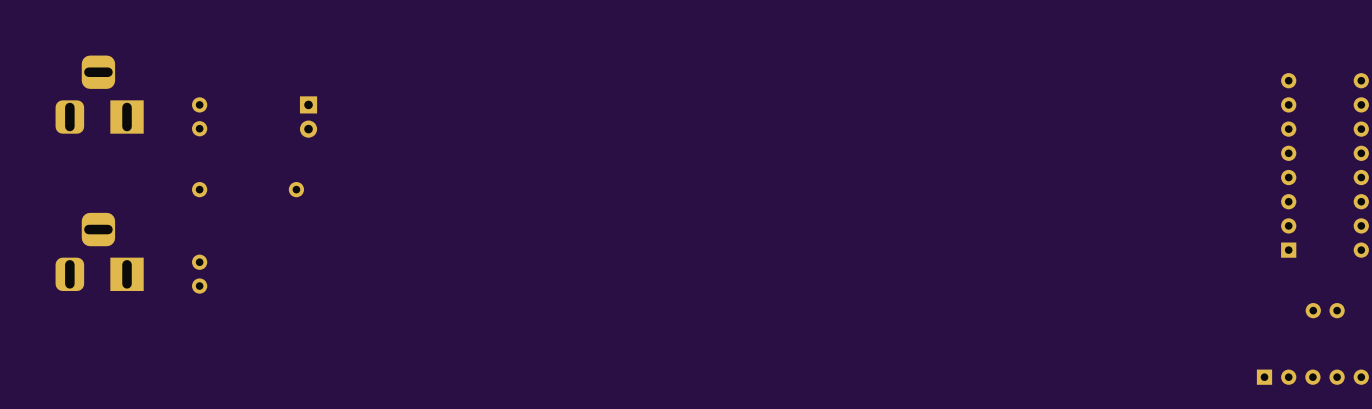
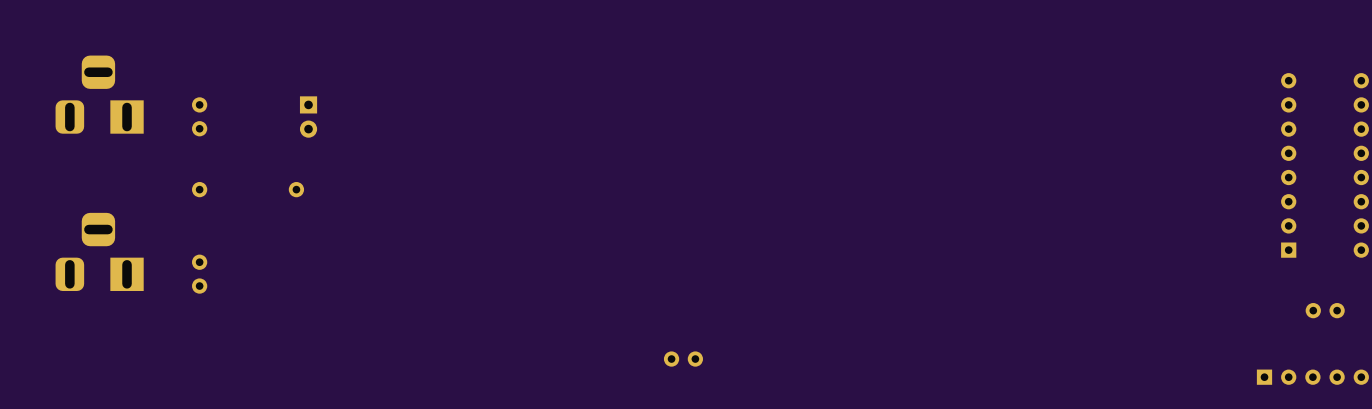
part: none -> (683, 359)

